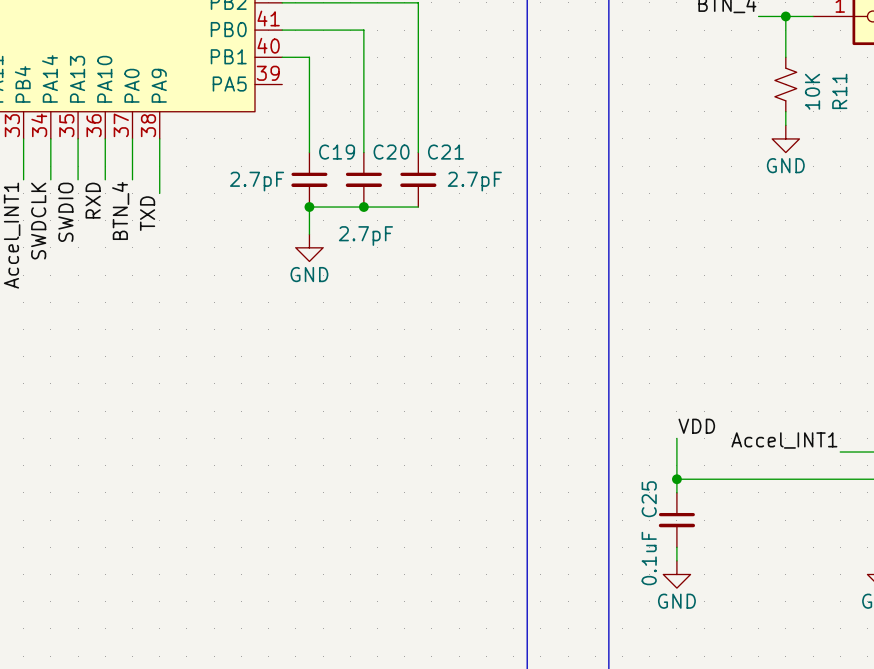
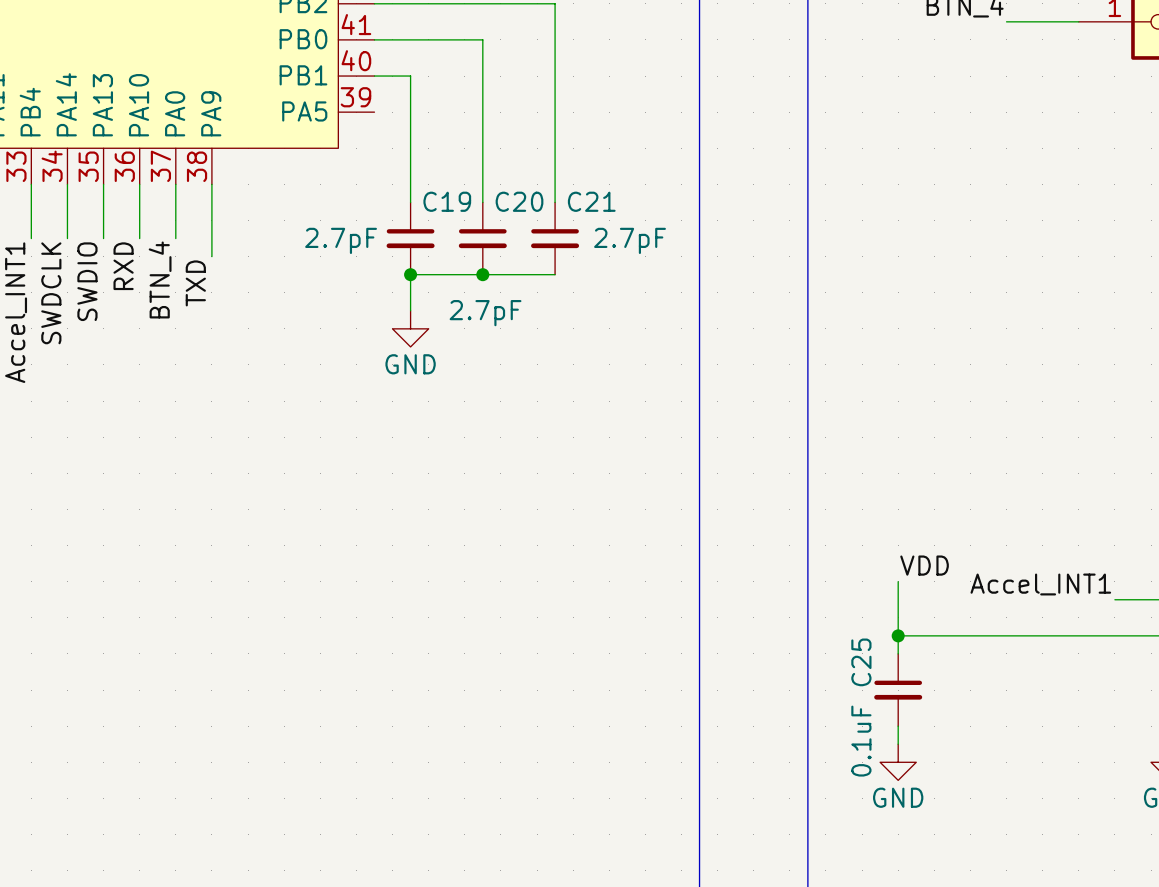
wire: (785, 16) (785, 57) -> none
junction: (785, 16) -> none
R11: 10K (785, 84) -> none
wire: (785, 111) (785, 125) -> none
power symbol: GND (785, 138) -> none

